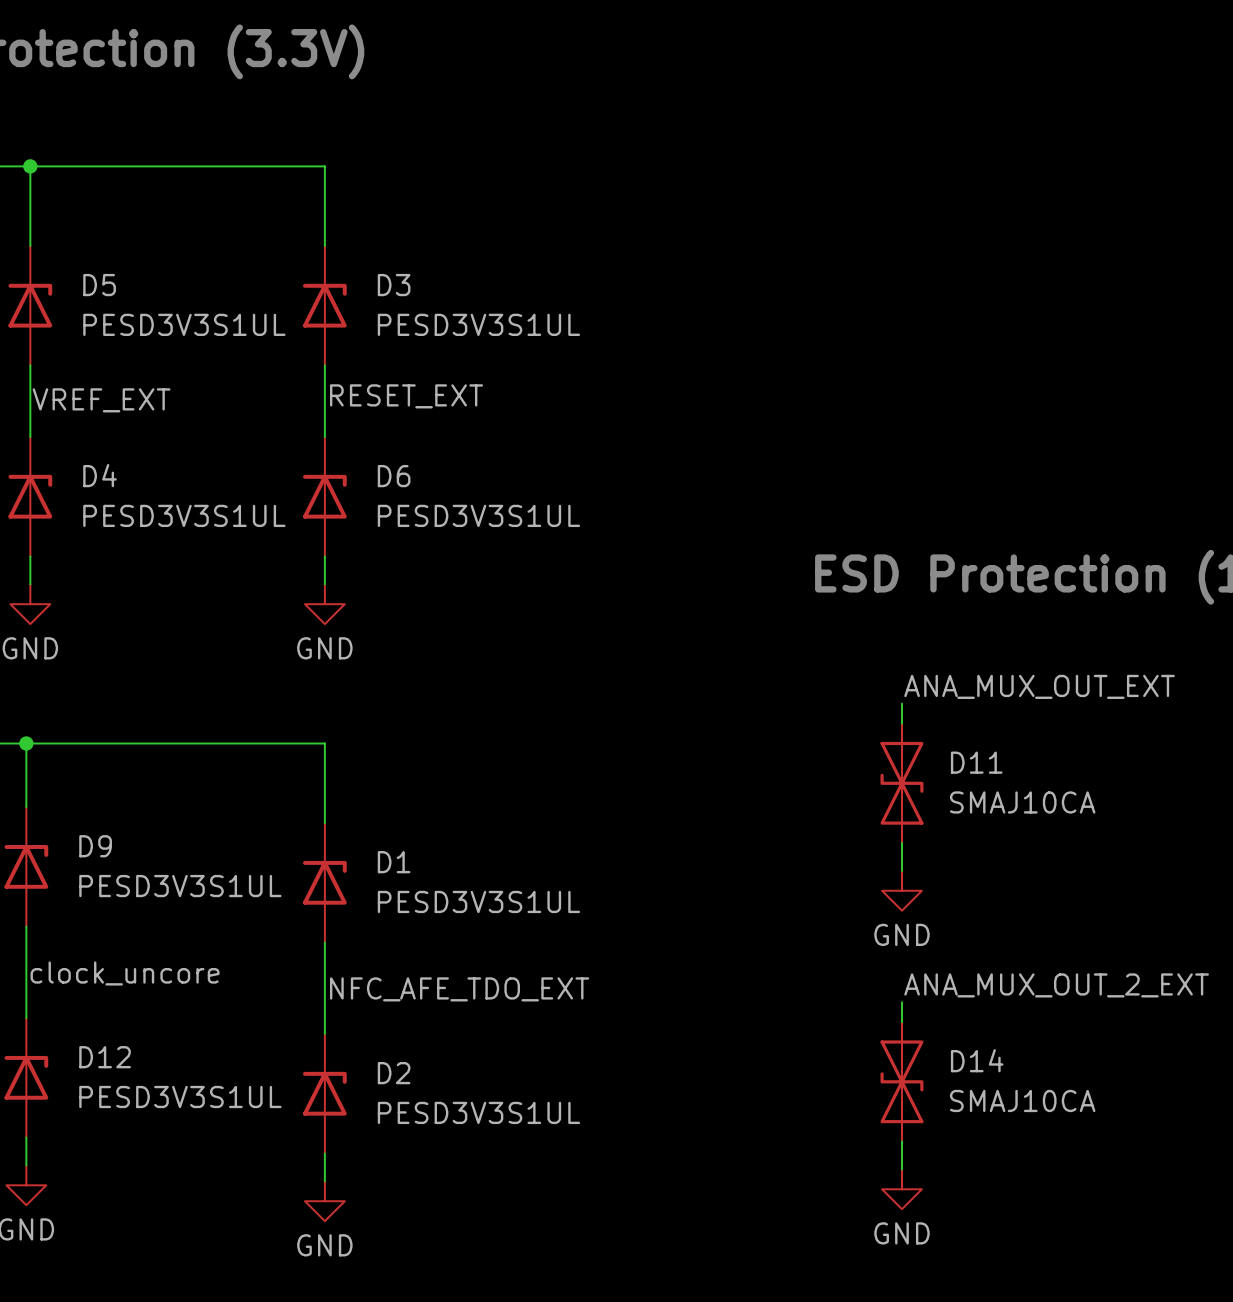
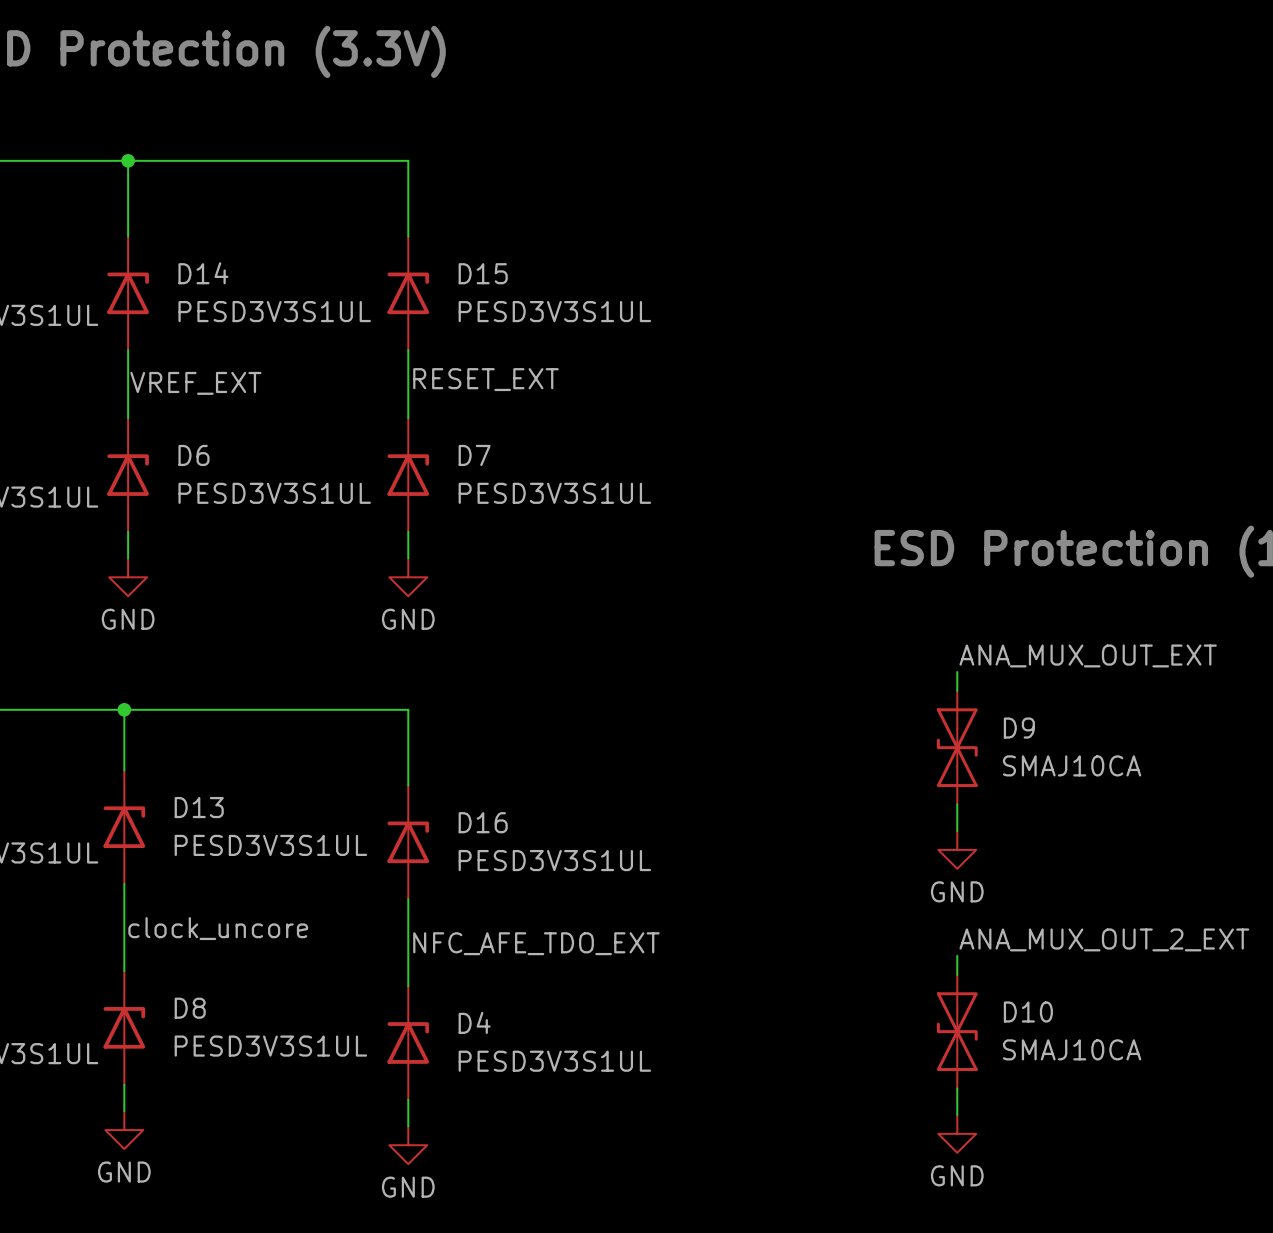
D5 name: D5 (99, 285) -> D14 (203, 273)
D3 name: D3 (394, 285) -> D15 (483, 273)
D4 name: D4 (100, 475) -> D6 (193, 455)
D6 name: D6 (394, 476) -> D7 (474, 455)
D11 name: D11 (976, 762) -> D9 (1019, 728)
D9 name: D9 (95, 846) -> D13 (199, 807)
D1 name: D1 (394, 862) -> D16 (483, 822)
D12 name: D12 (105, 1057) -> D8 (190, 1008)
D14 name: D14 (977, 1060) -> D10 (1028, 1011)
D2 name: D2 (394, 1073) -> D4 (474, 1022)

